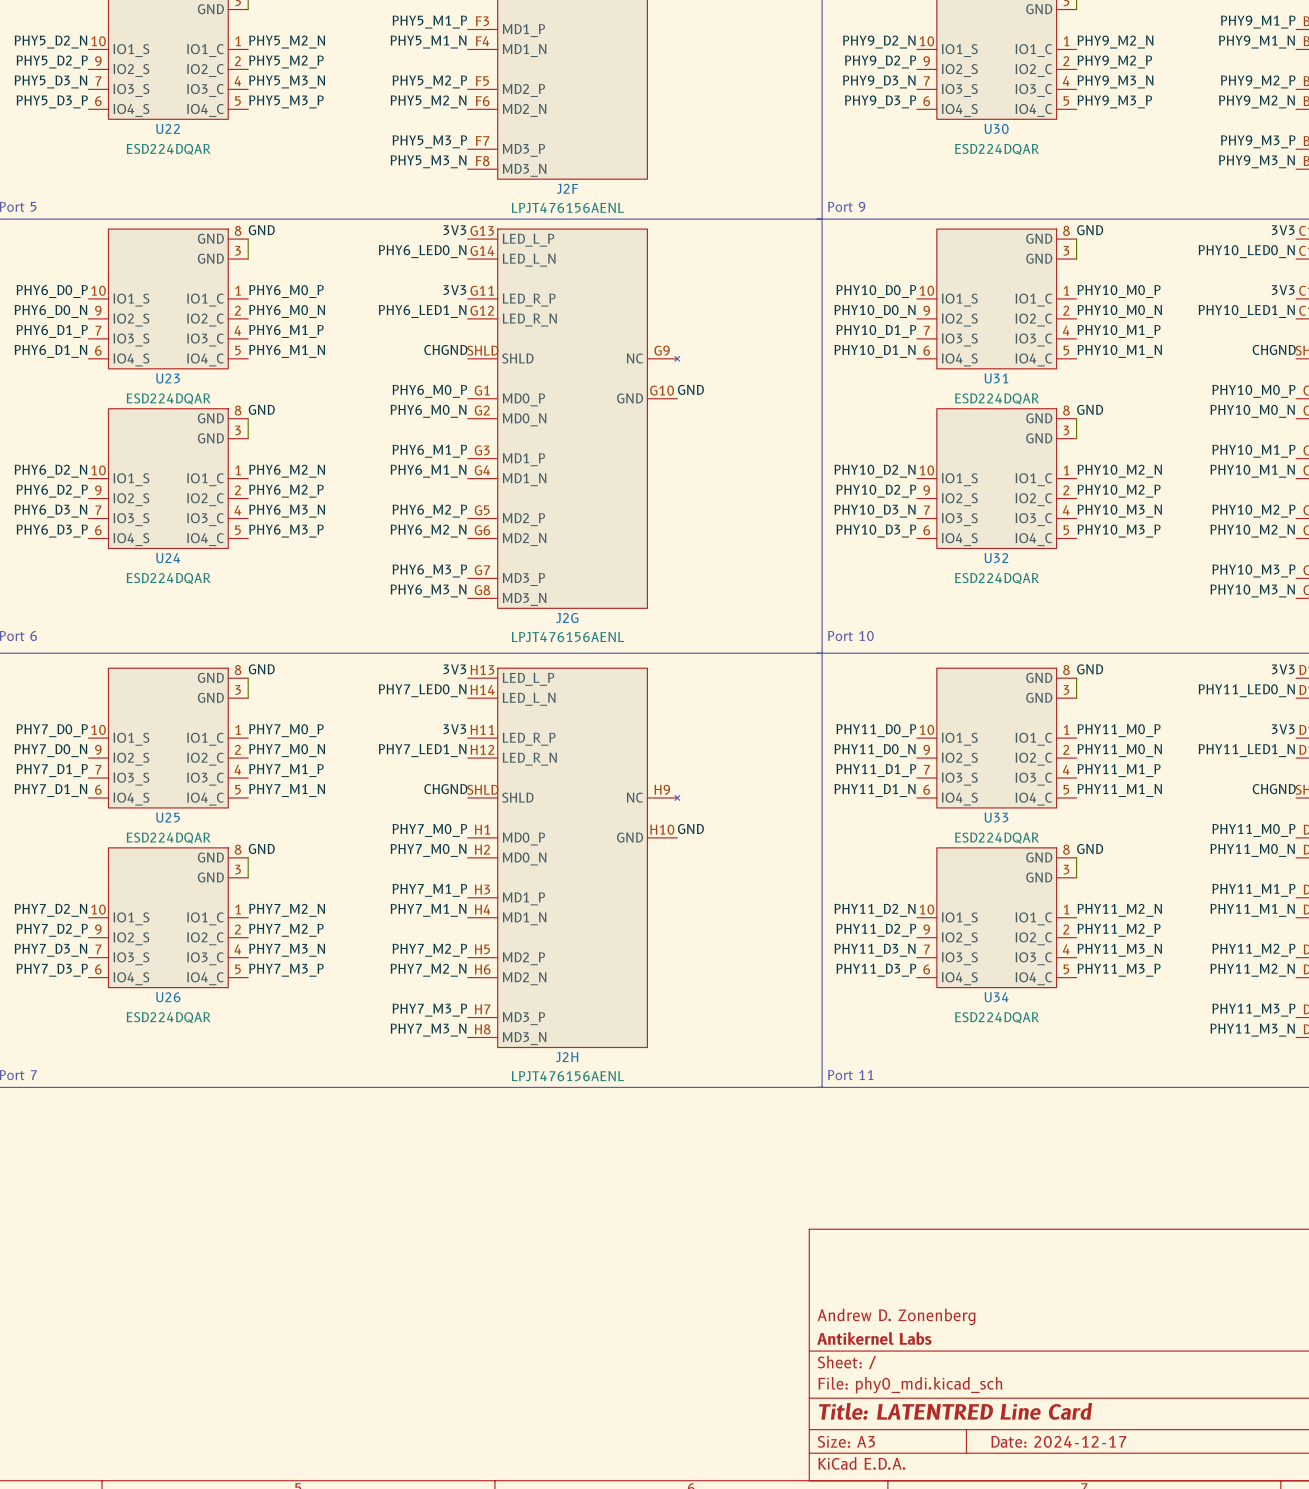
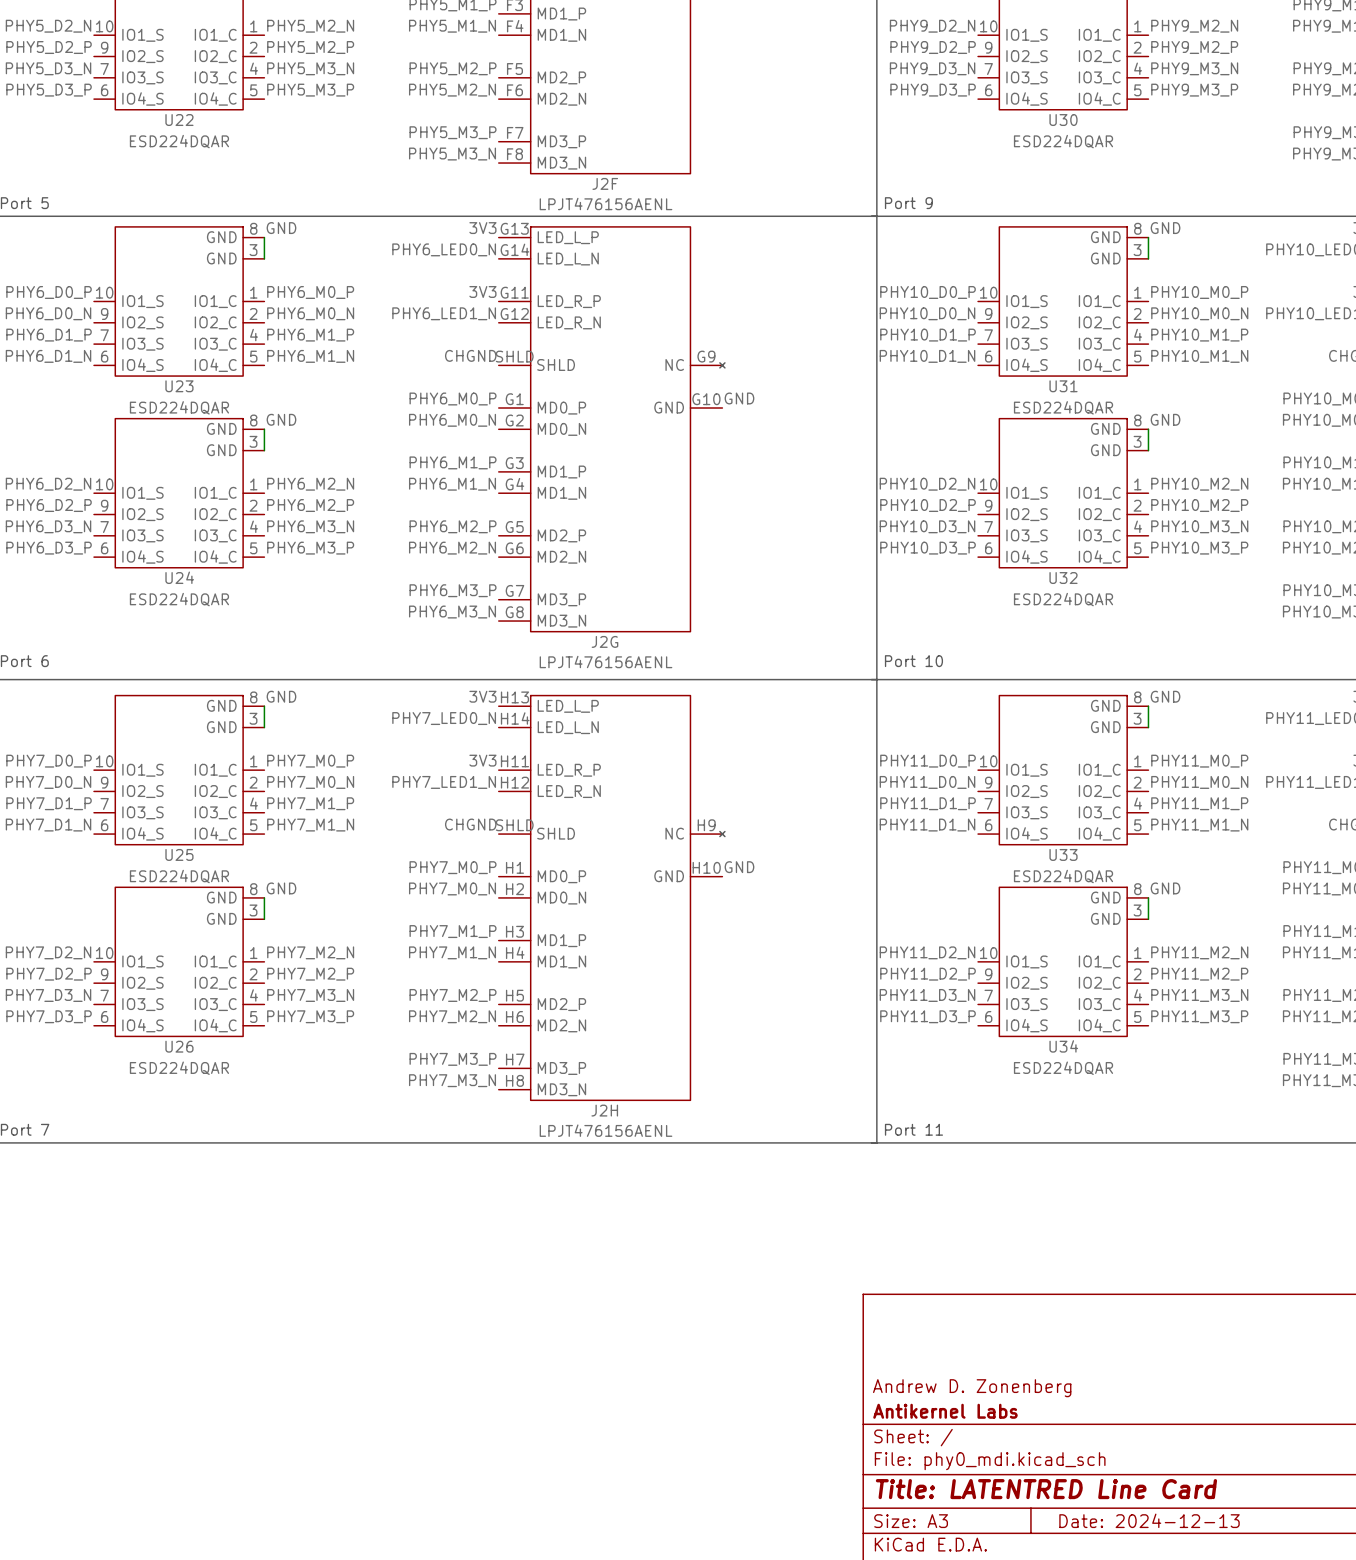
title block: Date: 2024-12-17 (1058, 1441) -> Date: 2024-12-13 (1149, 1520)

